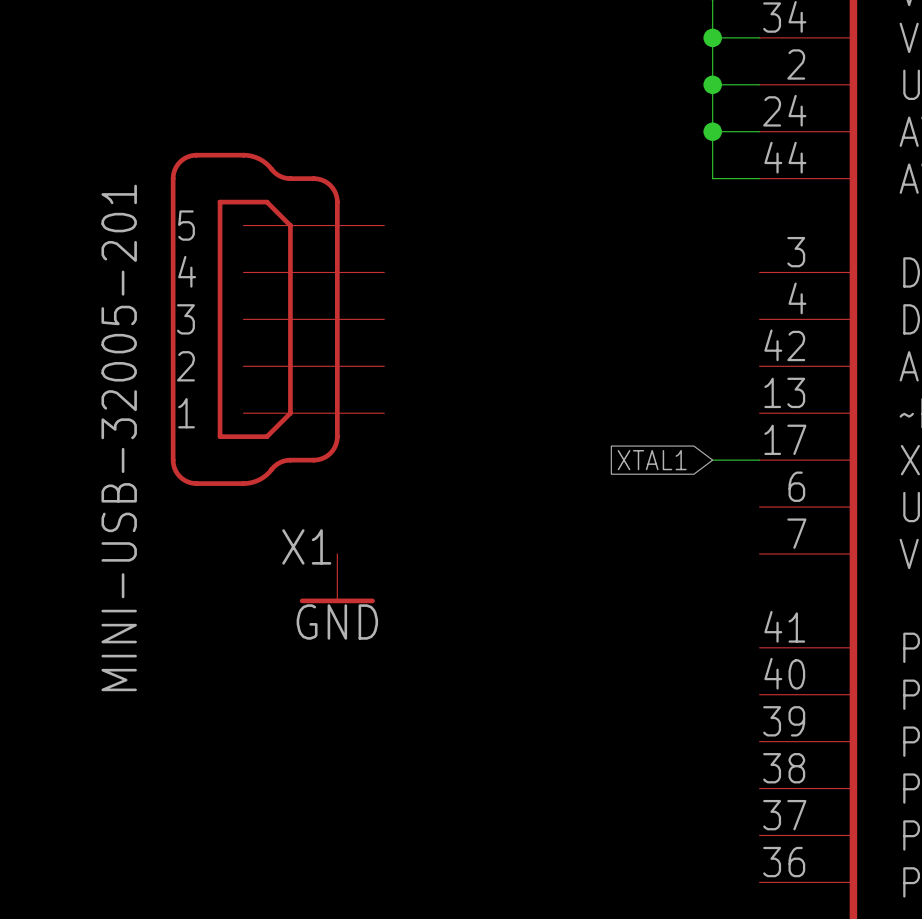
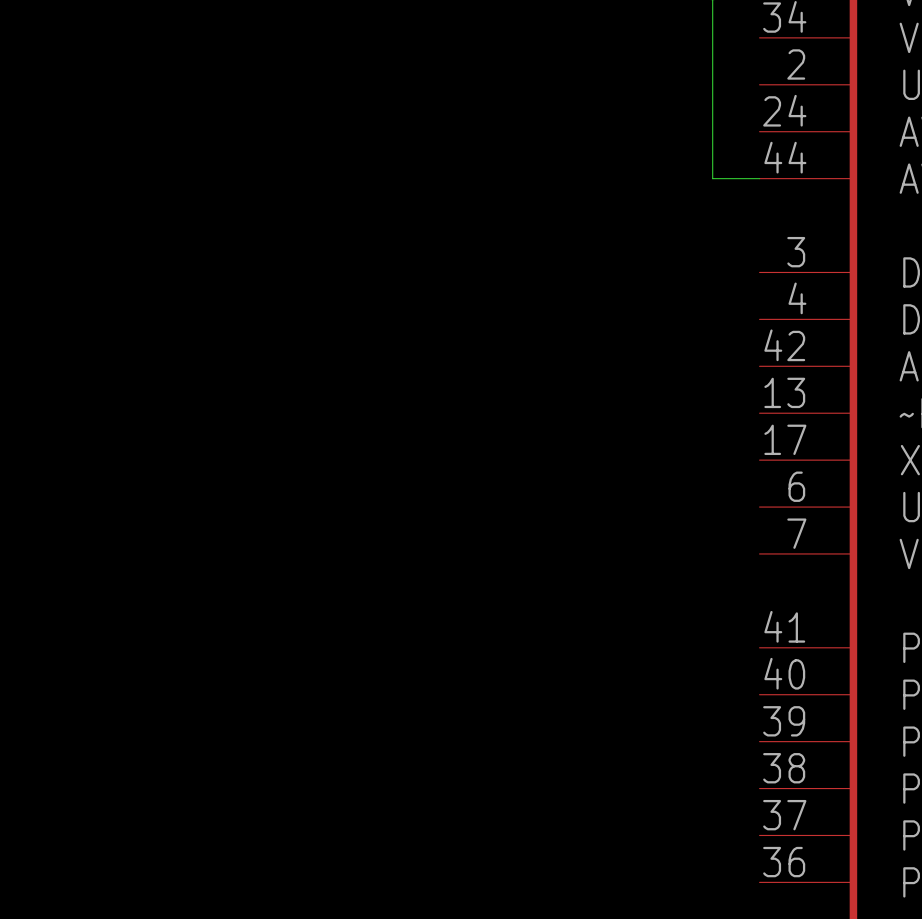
wire: (712, 37) (759, 37) -> none
junction: (712, 37) -> none
wire: (712, 84) (759, 84) -> none
junction: (712, 84) -> none
wire: (712, 131) (759, 131) -> none
junction: (712, 131) -> none
X1: MINI-USB-32005-201 (277, 319) -> none
global label: XTAL1 (652, 460) -> none
wire: (712, 460) (759, 460) -> none
power symbol: GND (337, 578) -> none

